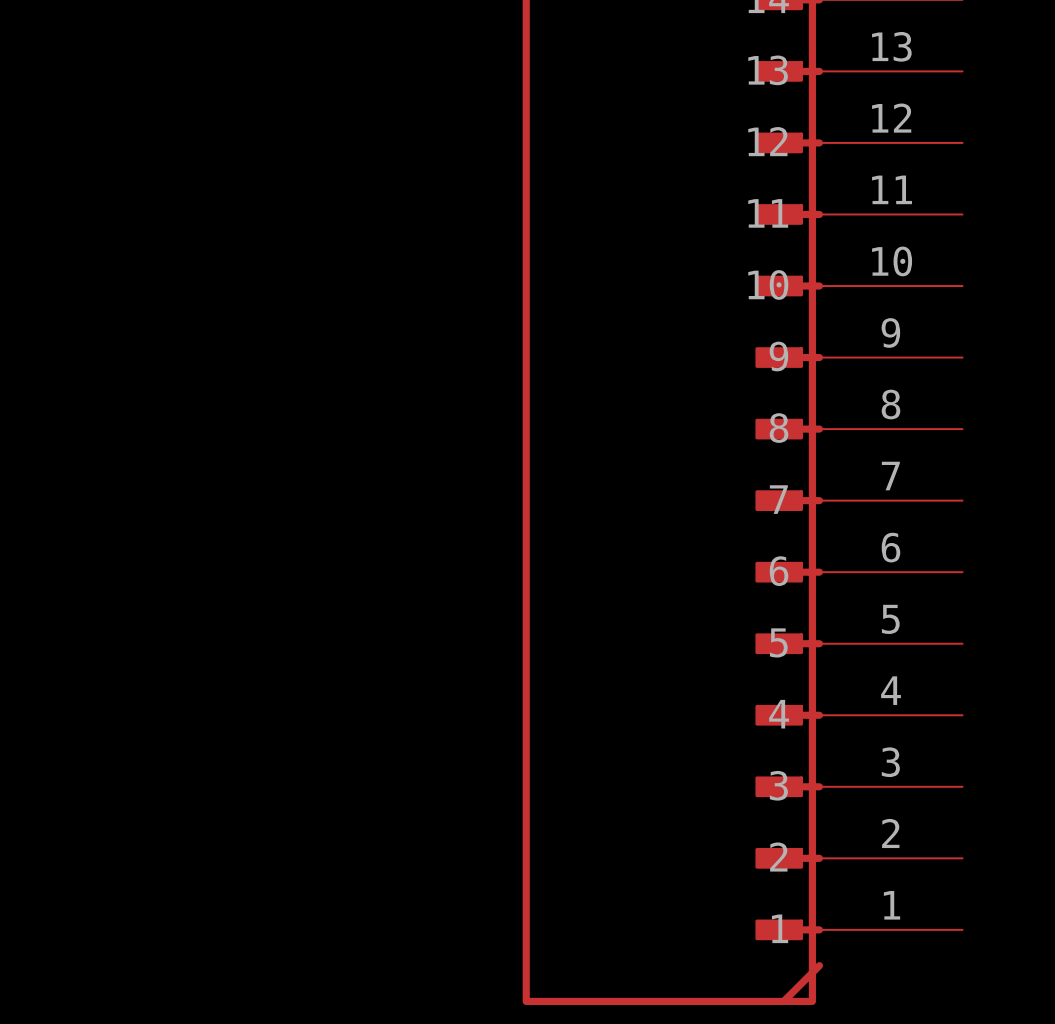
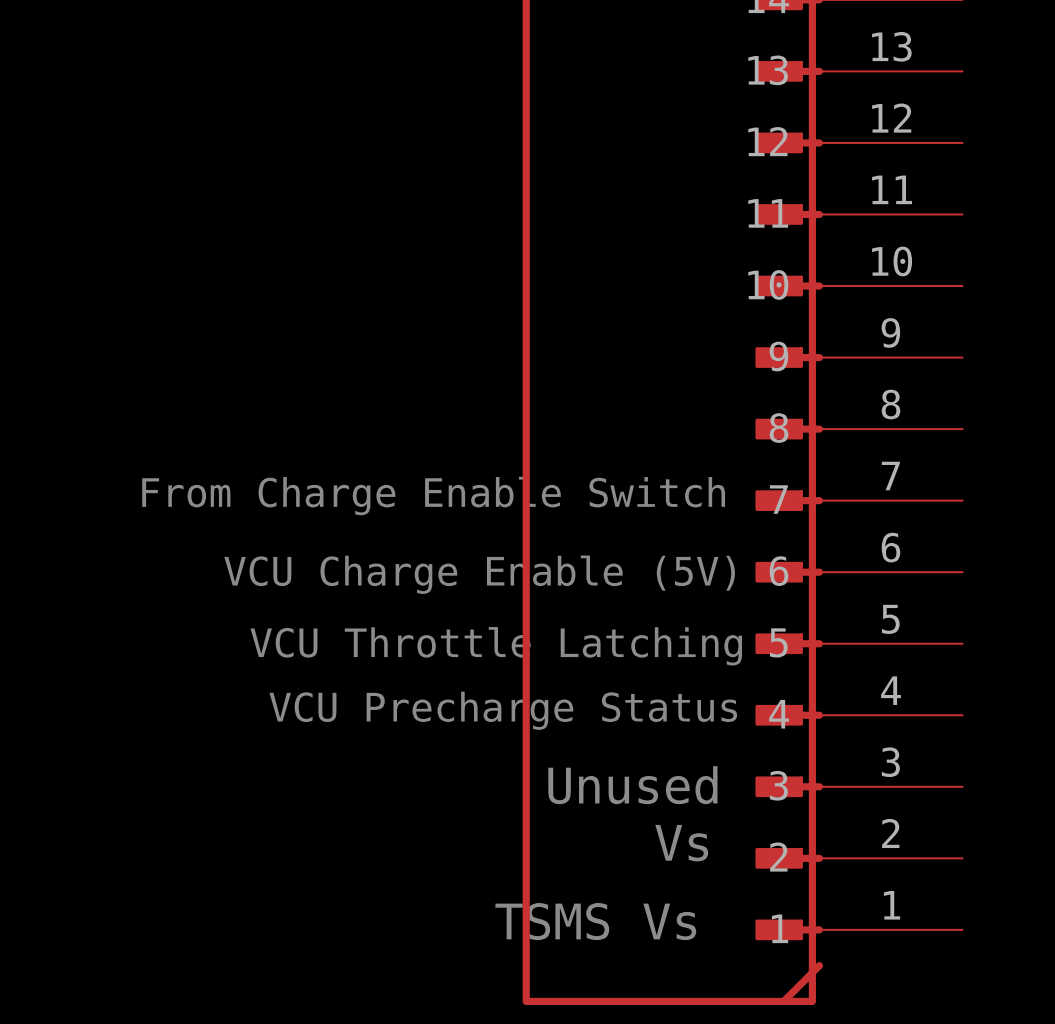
text: none -> From Charge Enable Switch (433, 496)
text: none -> VCU Charge Enable (5V) (479, 574)
text: none -> VCU Throttle Latching (496, 646)
text: none -> VCU Precharge Status (503, 710)
text: none -> Unused (632, 785)
text: none -> Vs (681, 843)
text: none -> TSMS Vs (595, 921)

